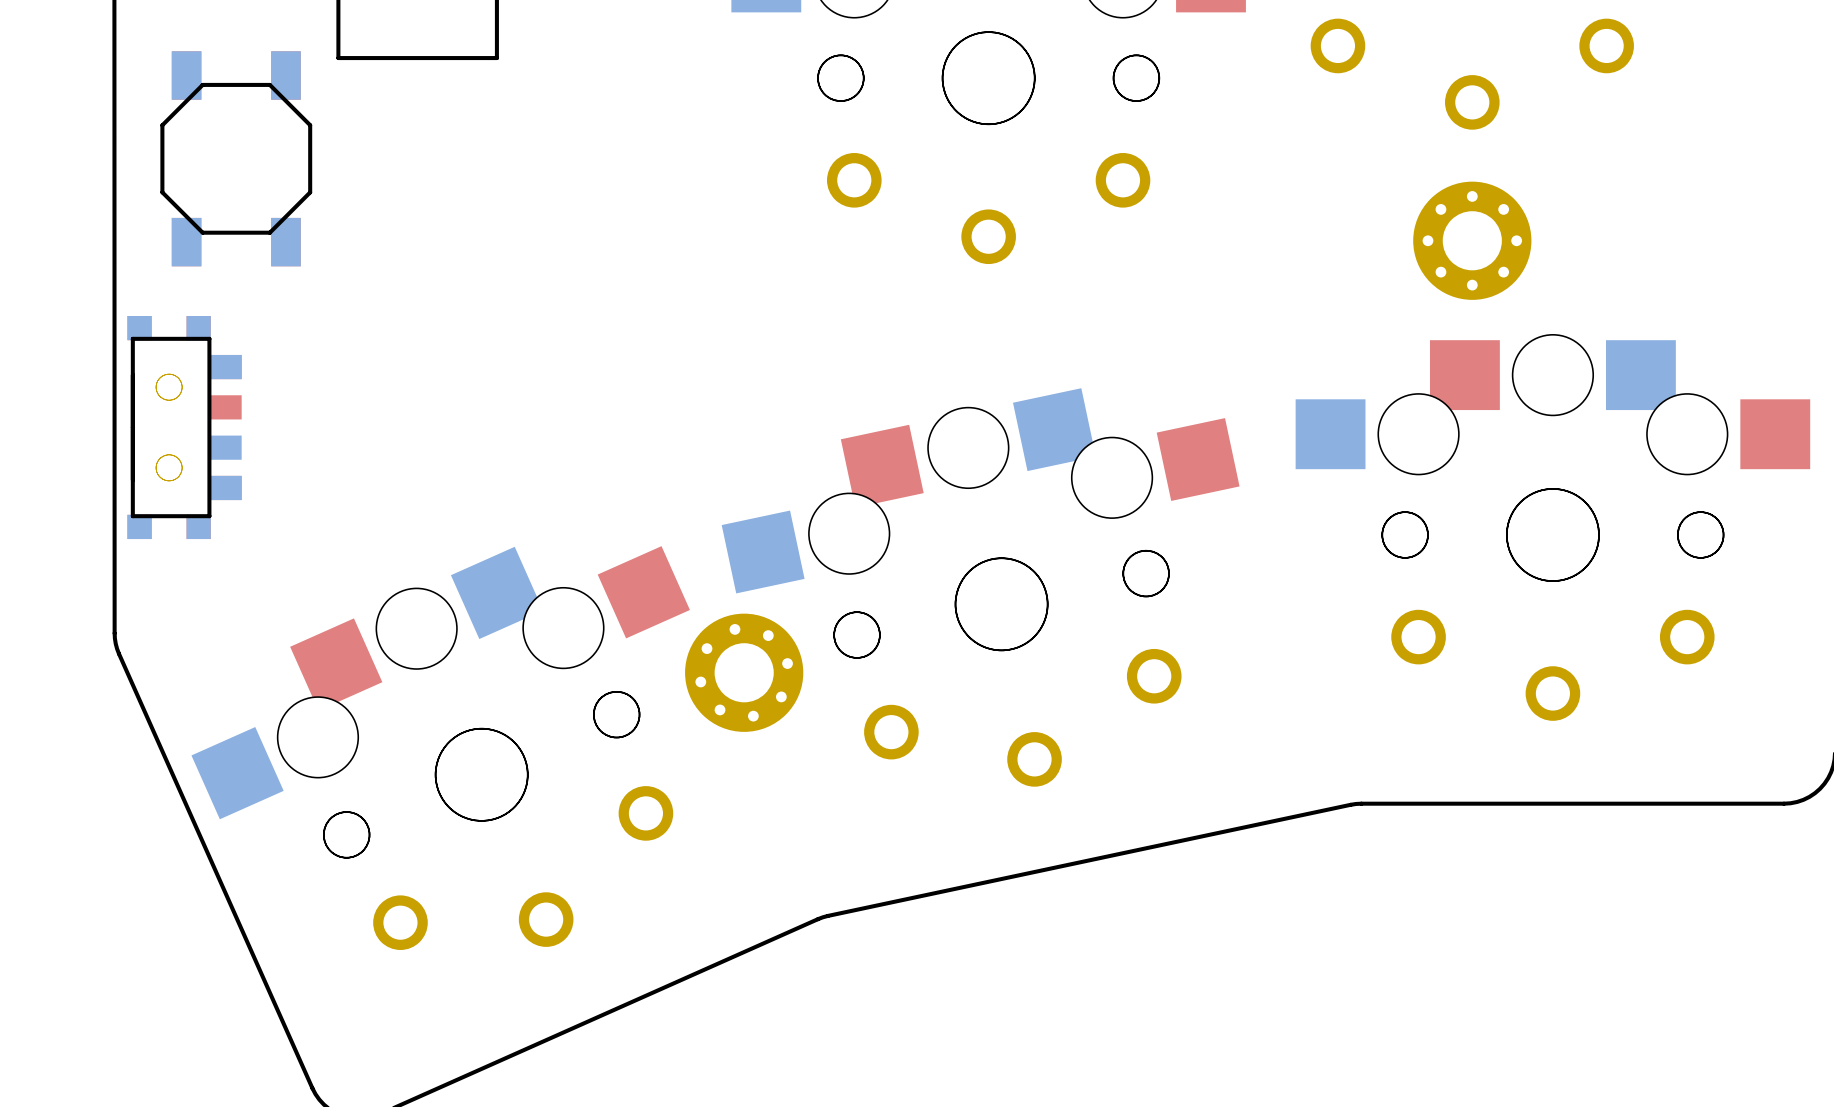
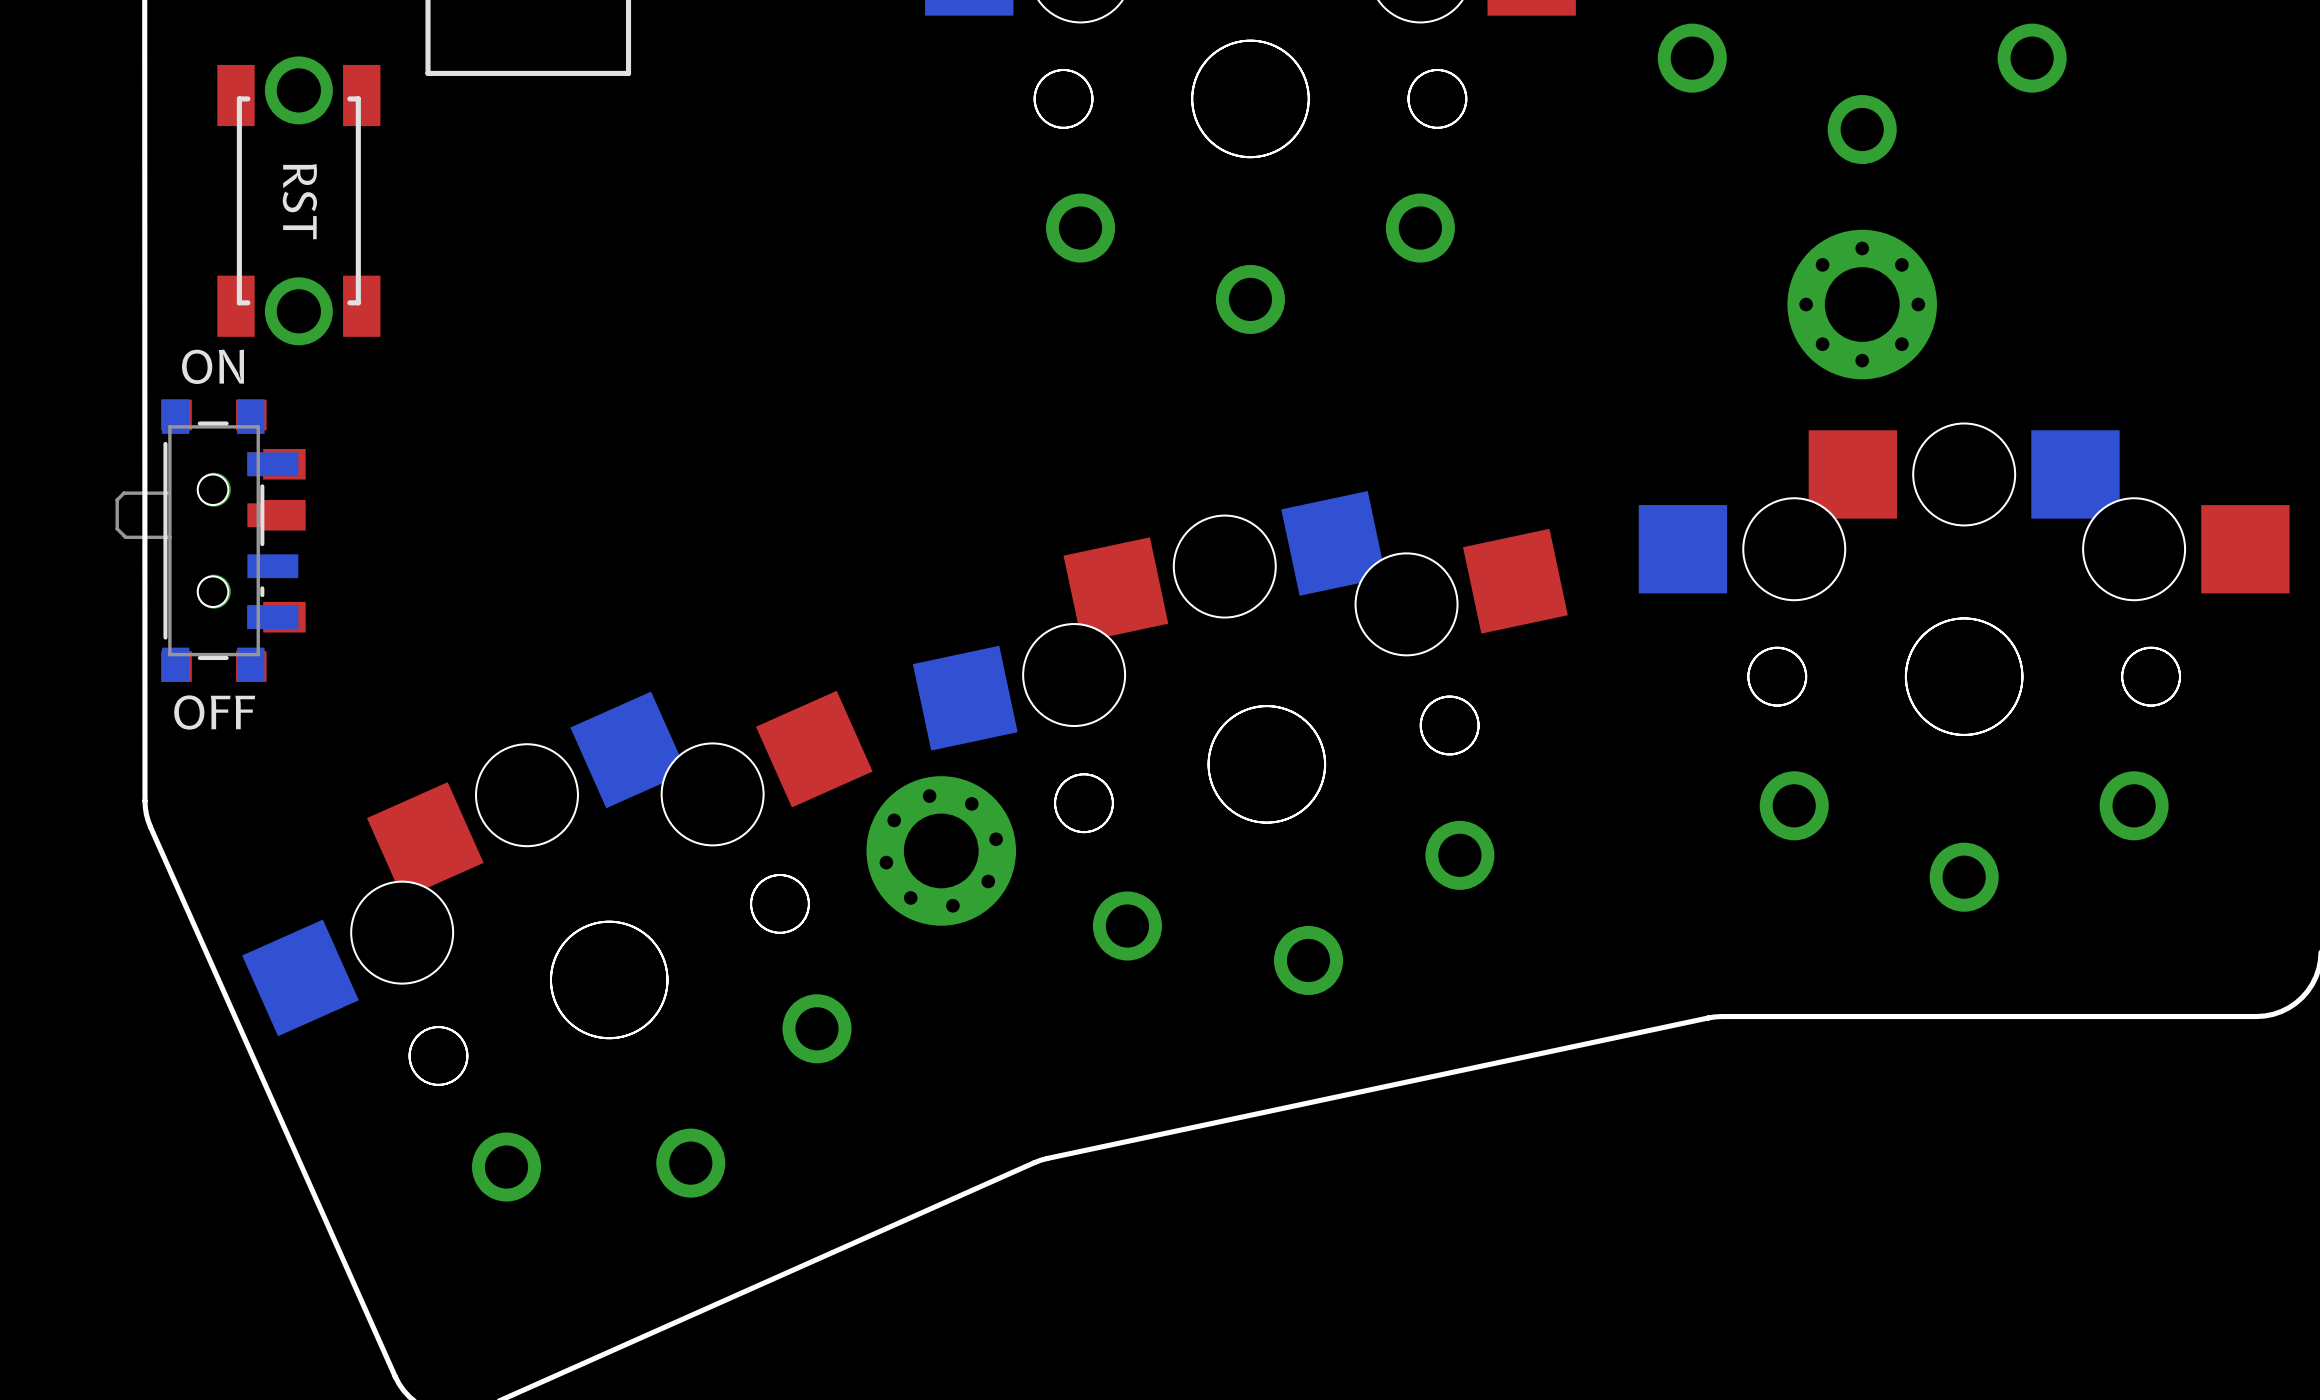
part footprint: [160, 51, 313, 267] -> [236, 56, 361, 346]
part footprint: [127, 316, 242, 540] -> [115, 399, 299, 682]

